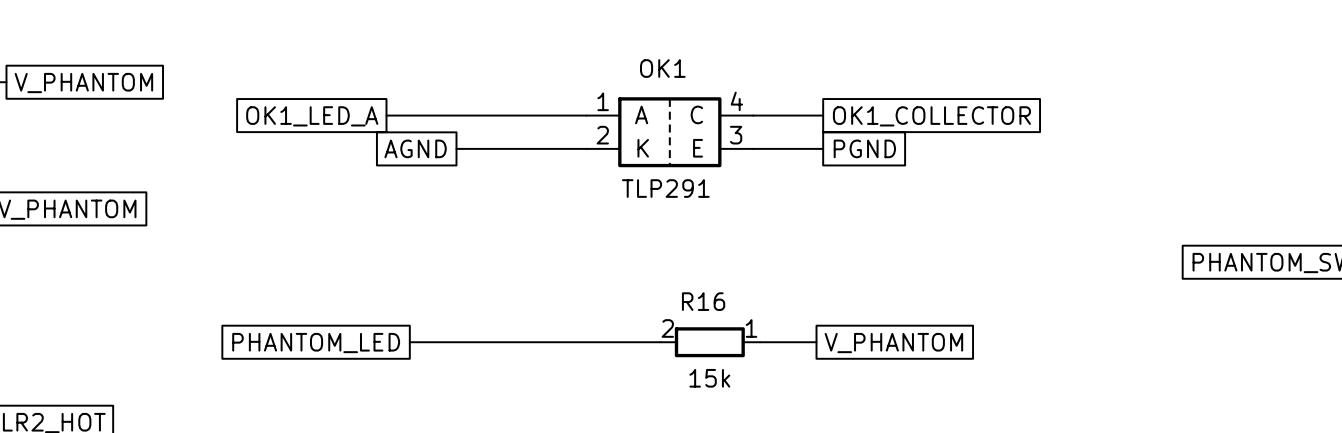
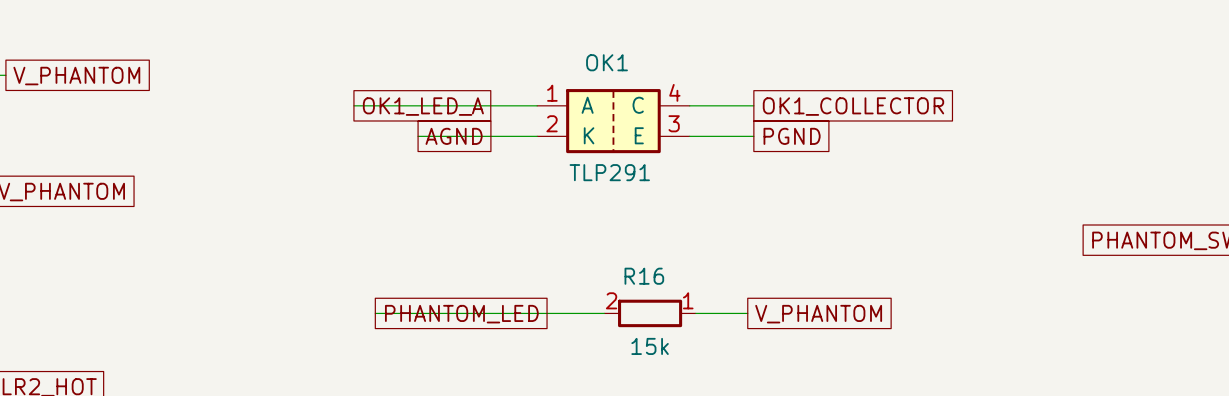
global label rotation: 0° (312, 116) -> 180° (423, 106)
global label rotation: 0° (415, 148) -> 180° (454, 136)
global label rotation: 0° (316, 343) -> 180° (461, 314)

